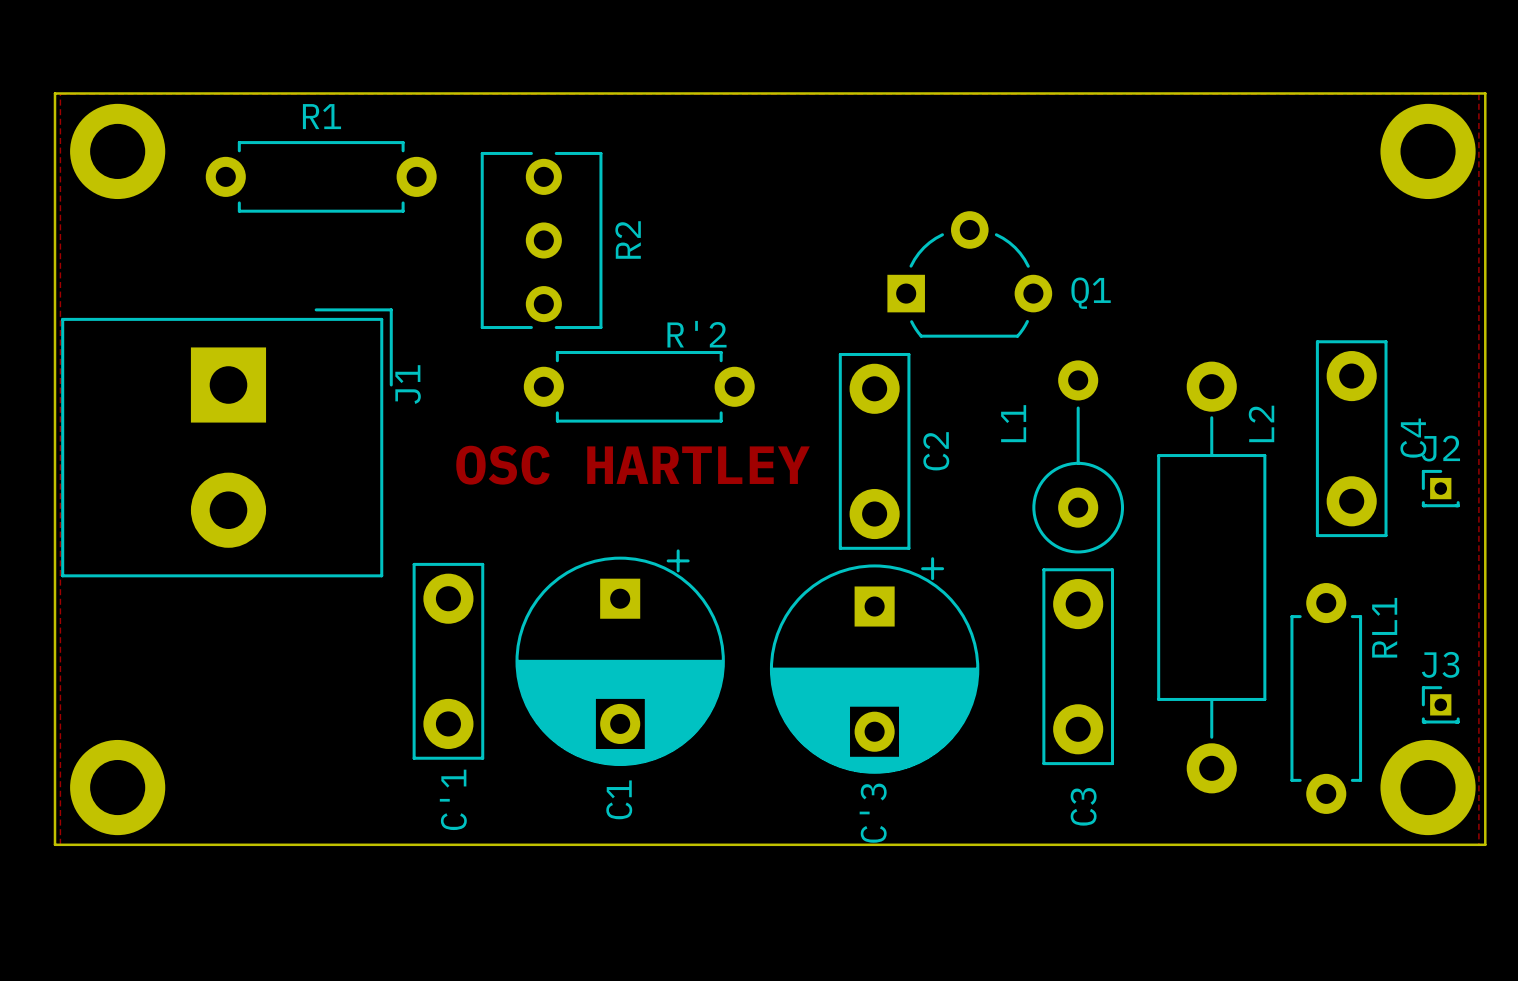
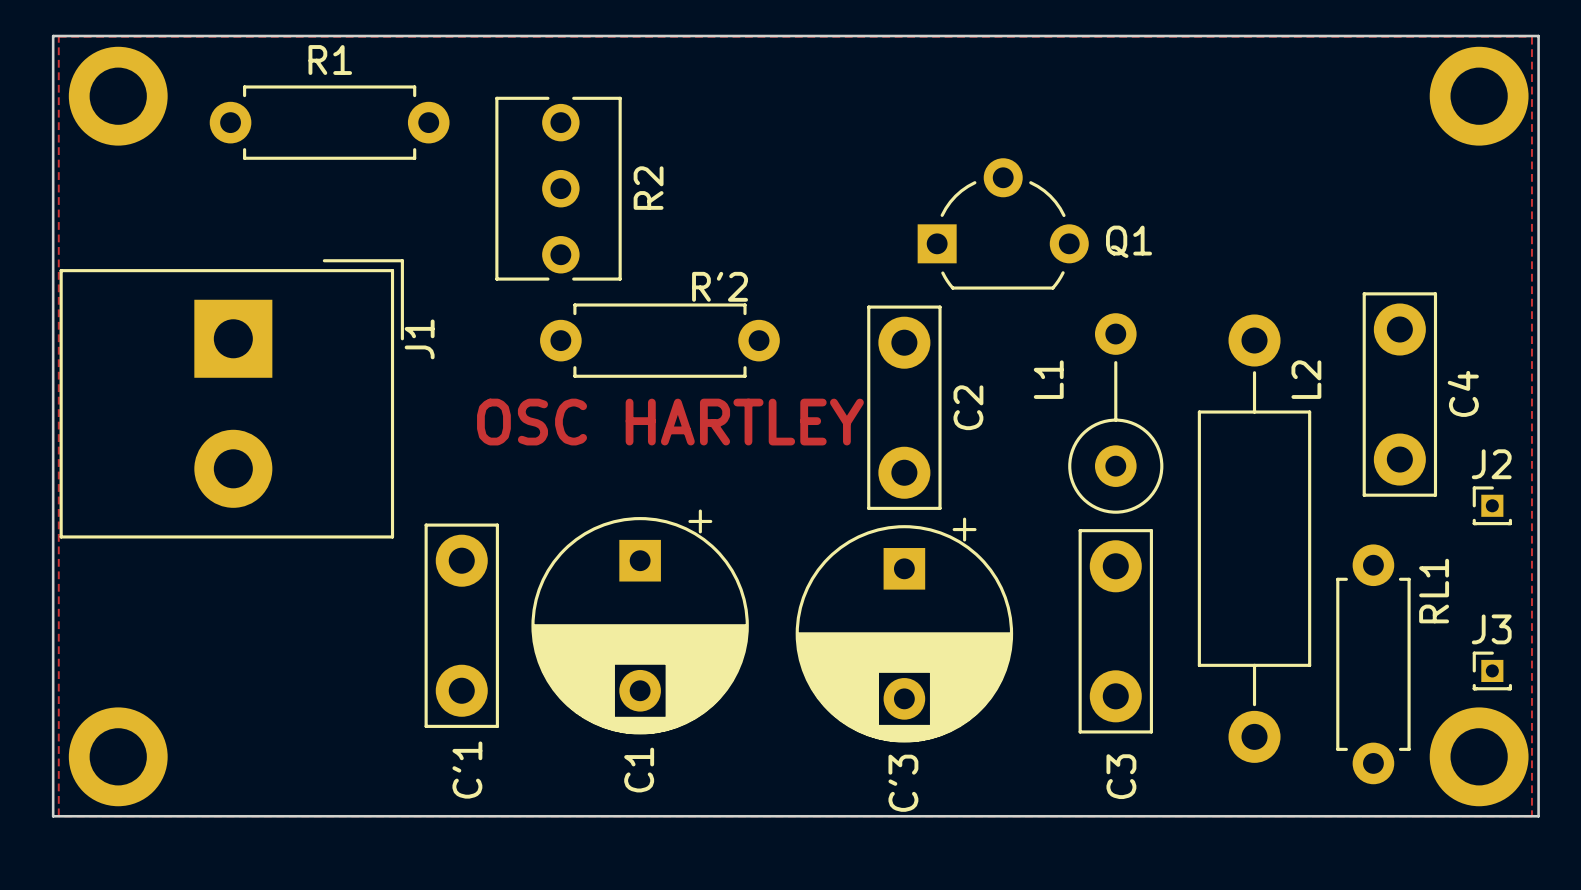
J2 position: (1440, 488) -> (1492, 505)

